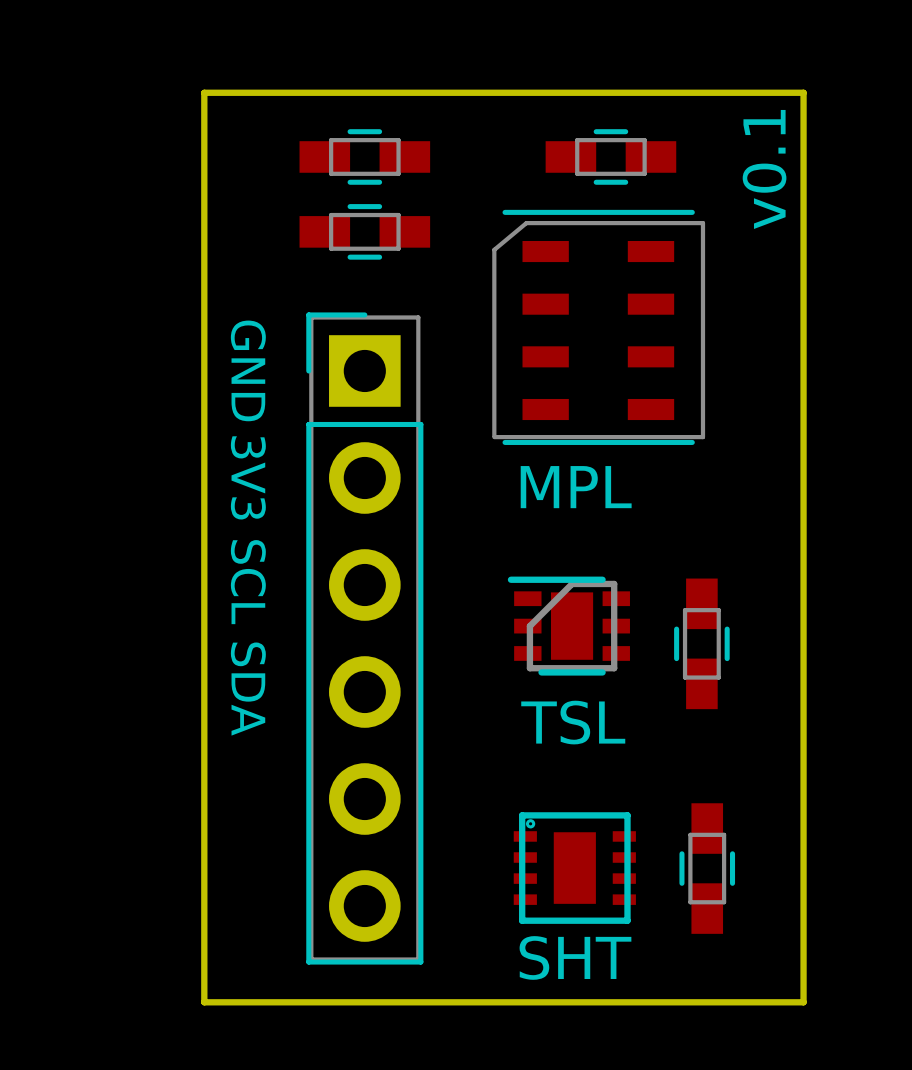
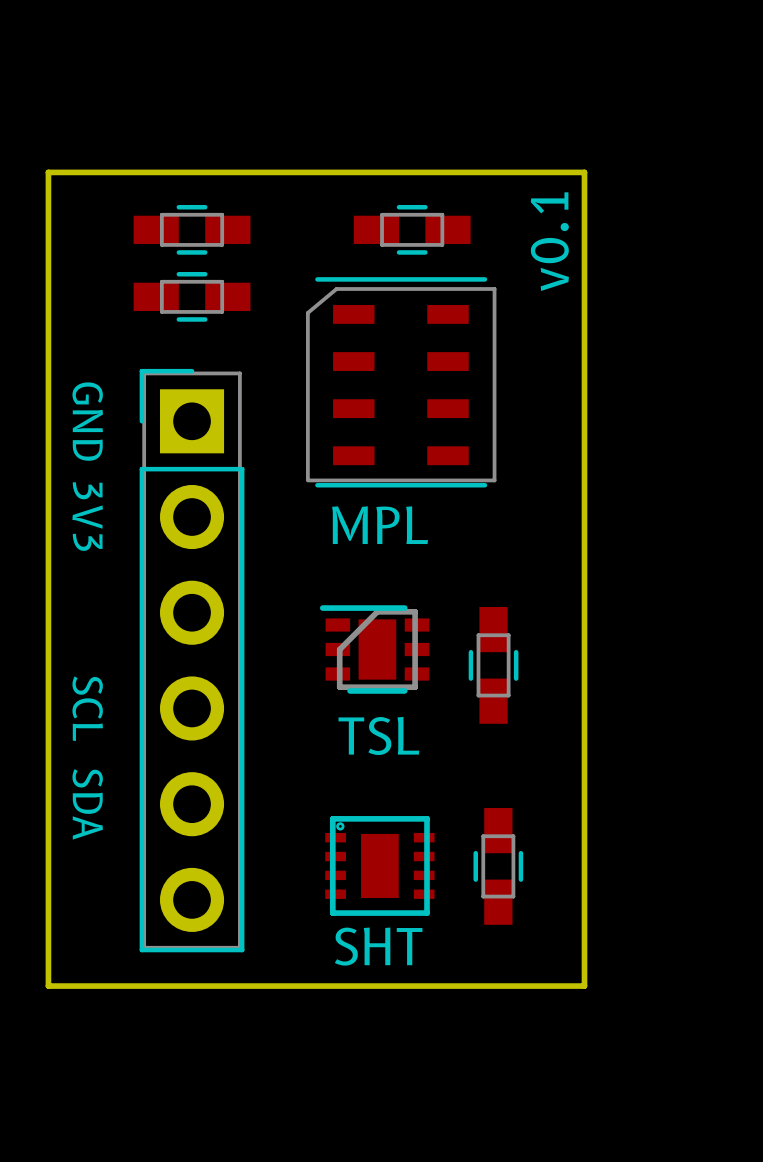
text: SCL (248, 582) -> none
text: SDA (248, 689) -> SCL (87, 708)
text: none -> SDA (87, 804)

